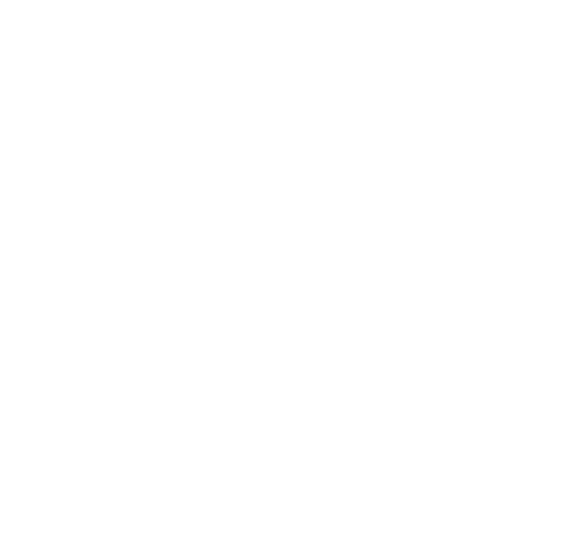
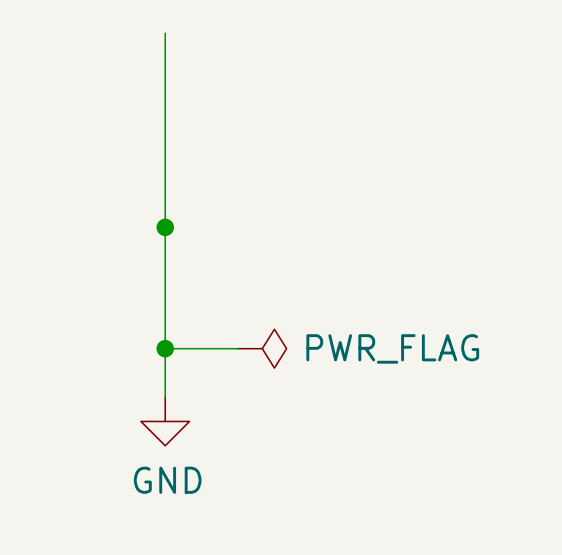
wire: none -> (165, 33) (165, 397)
junction: none -> (165, 227)
wire: none -> (165, 348) (238, 348)
junction: none -> (165, 348)
power symbol: none -> PWR_FLAG (262, 348)
power symbol: none -> GND (165, 421)

